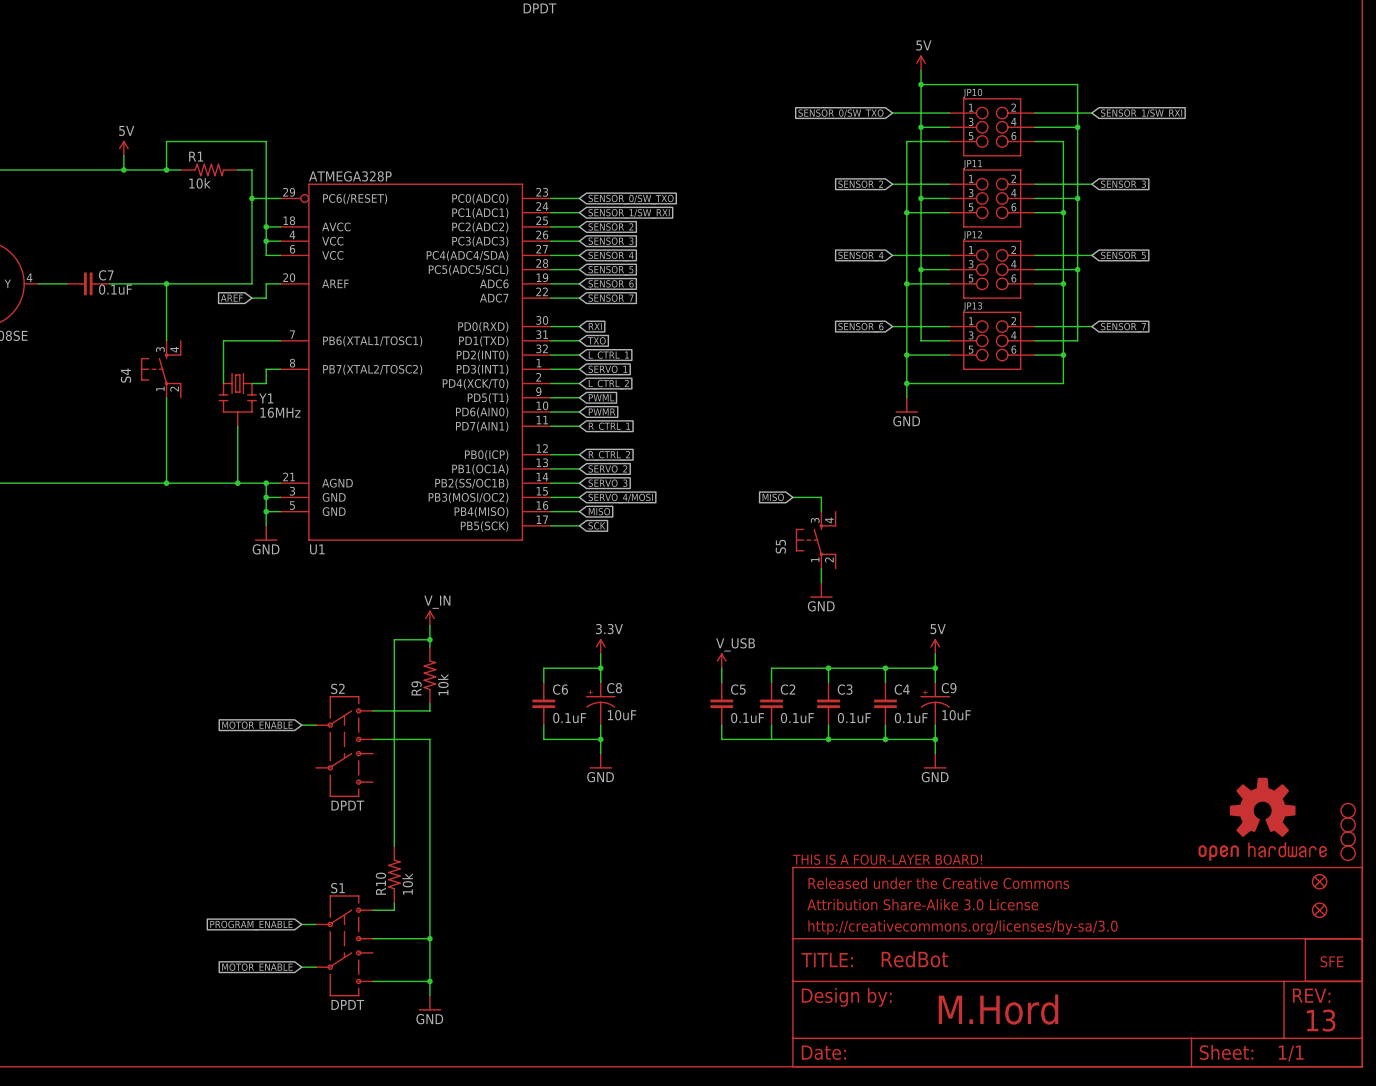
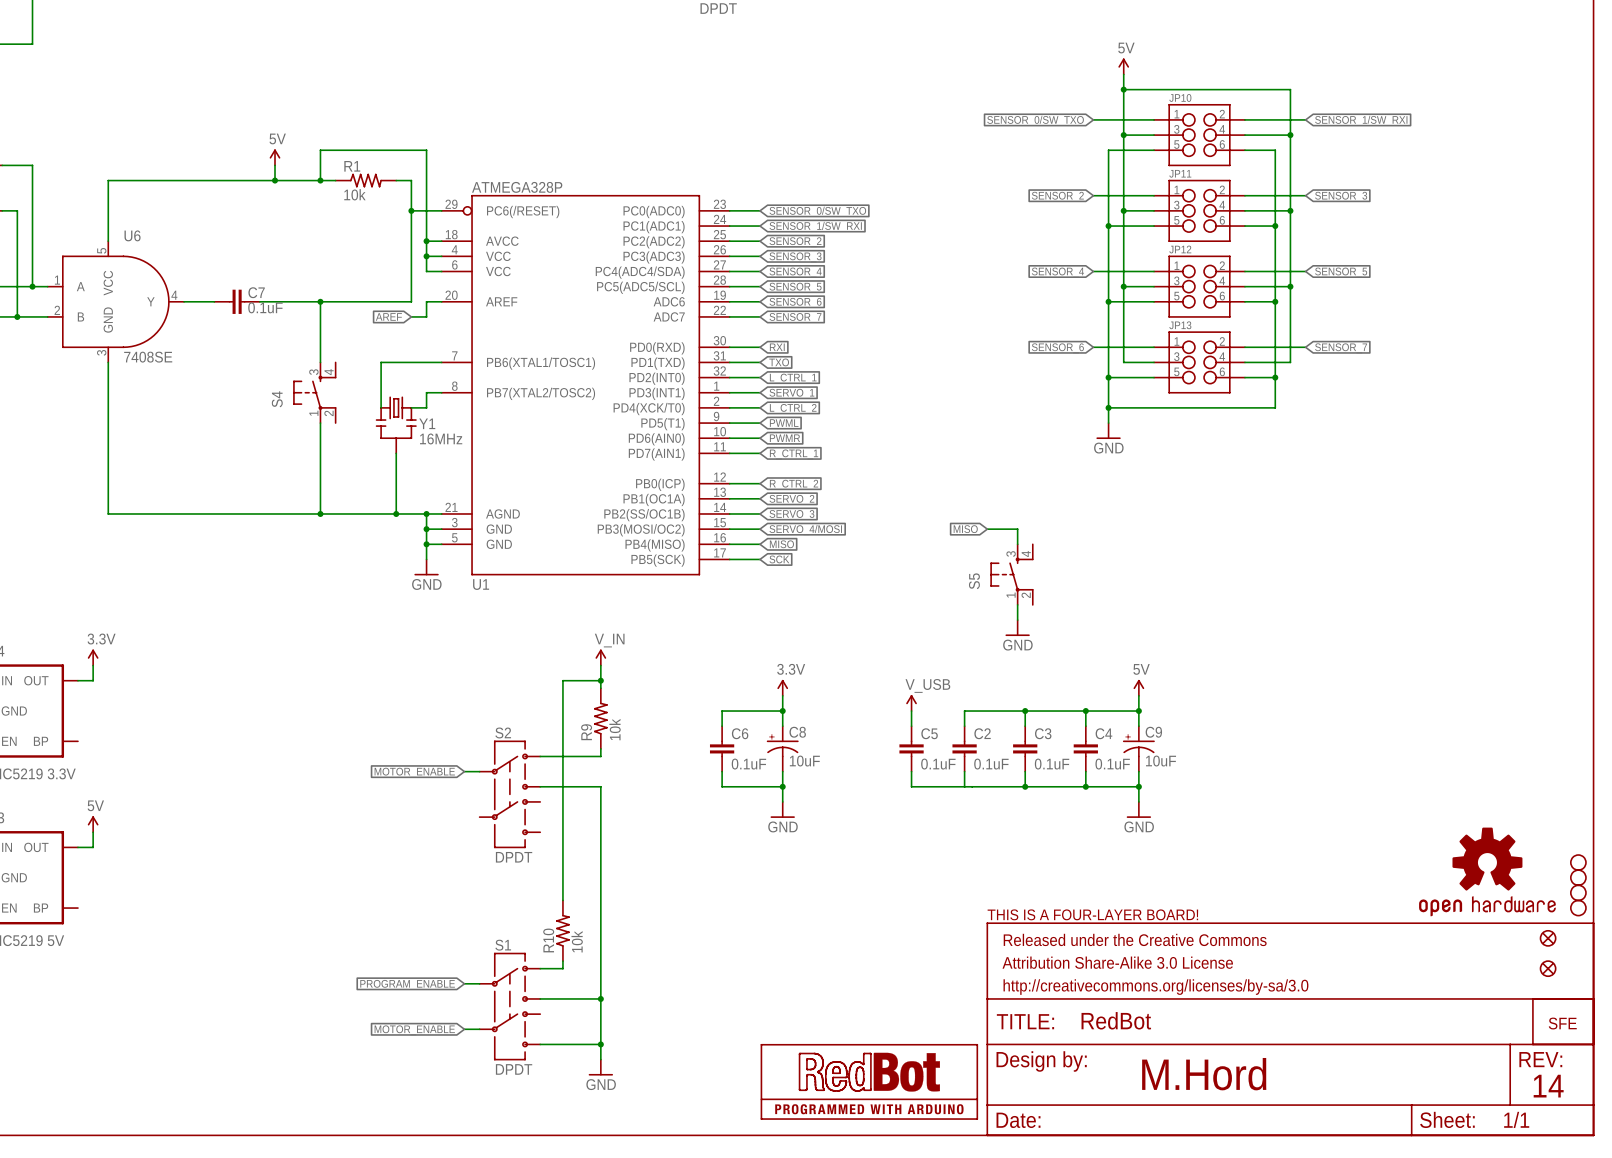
part: none -> (869, 1081)
text: 13 (1321, 1020) -> 14 (1548, 1086)

